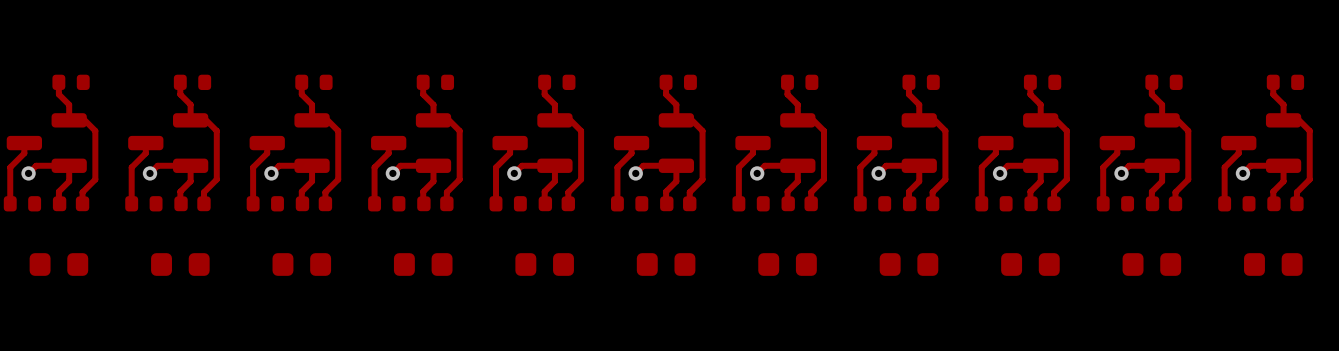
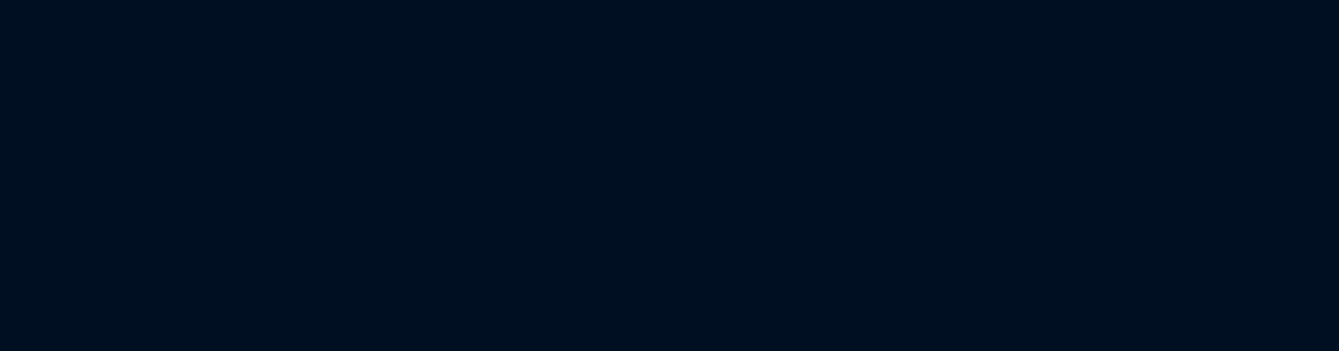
top track: (58, 82) (58, 94) (69, 104) (69, 120) (83, 118) (95, 130) (95, 179) (82, 192) (82, 203) -> none
part: (71, 82) -> none
top track: (180, 82) (180, 94) (190, 104) (190, 120) (204, 118) (216, 130) (216, 179) (203, 192) (203, 203) -> none
part: (192, 82) -> none
top track: (301, 82) (301, 94) (312, 104) (312, 120) (326, 118) (338, 130) (338, 179) (325, 192) (325, 203) -> none
part: (313, 82) -> none
top track: (423, 82) (423, 94) (433, 104) (433, 120) (447, 118) (459, 130) (459, 179) (446, 192) (446, 203) -> none
part: (435, 82) -> none
top track: (544, 82) (544, 94) (554, 104) (554, 120) (568, 118) (581, 130) (581, 179) (568, 192) (568, 203) -> none
part: (556, 82) -> none
top track: (666, 82) (666, 94) (676, 104) (676, 120) (690, 118) (702, 130) (702, 179) (689, 192) (689, 203) -> none
part: (678, 82) -> none
top track: (787, 82) (787, 94) (797, 104) (797, 120) (811, 118) (823, 130) (823, 179) (811, 192) (811, 203) -> none
part: (799, 82) -> none
top track: (908, 82) (908, 94) (919, 104) (919, 120) (933, 118) (945, 130) (945, 179) (932, 192) (932, 203) -> none
part: (921, 82) -> none
top track: (1030, 82) (1030, 94) (1040, 104) (1040, 120) (1054, 118) (1066, 130) (1066, 179) (1054, 192) (1054, 203) -> none
part: (1042, 82) -> none
top track: (1151, 82) (1151, 94) (1162, 104) (1162, 120) (1176, 118) (1188, 130) (1188, 179) (1175, 192) (1175, 203) -> none
part: (1164, 82) -> none
top track: (1273, 82) (1273, 94) (1283, 104) (1283, 120) (1297, 118) (1309, 130) (1309, 179) (1296, 192) (1296, 203) -> none
part: (1285, 82) -> none
top track: (24, 143) (24, 153) (10, 167) (10, 203) -> none
part: (46, 143) -> none
top track: (145, 143) (145, 153) (131, 167) (131, 203) -> none
part: (168, 143) -> none
top track: (267, 143) (267, 153) (253, 167) (253, 203) -> none
part: (289, 143) -> none
top track: (388, 143) (388, 153) (374, 167) (374, 203) -> none
part: (411, 143) -> none
top track: (510, 143) (510, 153) (496, 167) (496, 203) -> none
part: (532, 143) -> none
top track: (631, 143) (631, 153) (617, 167) (617, 203) -> none
part: (653, 143) -> none
top track: (753, 143) (753, 153) (738, 167) (738, 203) -> none
part: (775, 143) -> none
top track: (874, 143) (874, 153) (860, 167) (860, 203) -> none
part: (896, 143) -> none
top track: (995, 143) (995, 153) (981, 167) (981, 203) -> none
part: (1018, 143) -> none
top track: (1117, 143) (1117, 153) (1103, 167) (1103, 203) -> none
part: (1139, 143) -> none
top track: (1238, 143) (1238, 153) (1224, 167) (1224, 203) -> none
part: (1261, 143) -> none
top track: (28, 173) (36, 165) (69, 165) (69, 181) (58, 191) (59, 203) -> none
via: (28, 173) -> none
top track: (150, 173) (157, 165) (190, 165) (190, 181) (180, 191) (181, 203) -> none
via: (150, 173) -> none
top track: (271, 173) (279, 165) (312, 165) (312, 181) (301, 191) (302, 203) -> none
via: (271, 173) -> none
top track: (392, 173) (400, 165) (433, 165) (433, 181) (423, 191) (423, 203) -> none
via: (392, 173) -> none
top track: (514, 173) (521, 165) (554, 165) (554, 181) (544, 191) (545, 203) -> none
via: (514, 173) -> none
top track: (635, 173) (643, 165) (676, 165) (676, 181) (666, 191) (666, 203) -> none
via: (635, 173) -> none
top track: (757, 173) (764, 165) (797, 165) (797, 181) (787, 191) (788, 203) -> none
via: (757, 173) -> none
top track: (878, 173) (886, 165) (919, 165) (919, 181) (908, 191) (909, 203) -> none
via: (878, 173) -> none
top track: (1000, 173) (1007, 165) (1040, 165) (1040, 181) (1030, 191) (1031, 203) -> none
via: (1000, 173) -> none
top track: (1121, 173) (1129, 165) (1162, 165) (1162, 181) (1151, 191) (1152, 203) -> none
via: (1121, 173) -> none
top track: (1242, 173) (1250, 165) (1283, 165) (1283, 181) (1273, 191) (1273, 203) -> none
via: (1242, 173) -> none
part: (22, 203) -> none
part: (71, 203) -> none
part: (143, 203) -> none
part: (192, 203) -> none
part: (265, 203) -> none
part: (313, 203) -> none
part: (386, 203) -> none
part: (435, 203) -> none
part: (508, 203) -> none
part: (556, 203) -> none
part: (629, 203) -> none
part: (678, 203) -> none
part: (751, 203) -> none
part: (799, 203) -> none
part: (872, 203) -> none
part: (921, 203) -> none
part: (993, 203) -> none
part: (1042, 203) -> none
part: (1115, 203) -> none
part: (1164, 203) -> none
part: (1236, 203) -> none
part: (1285, 203) -> none
part: (58, 264) -> none
part: (180, 264) -> none
part: (301, 264) -> none
part: (423, 264) -> none
part: (544, 264) -> none
part: (666, 264) -> none
part: (787, 264) -> none
part: (908, 264) -> none
part: (1030, 264) -> none
part: (1151, 264) -> none
part: (1273, 264) -> none

